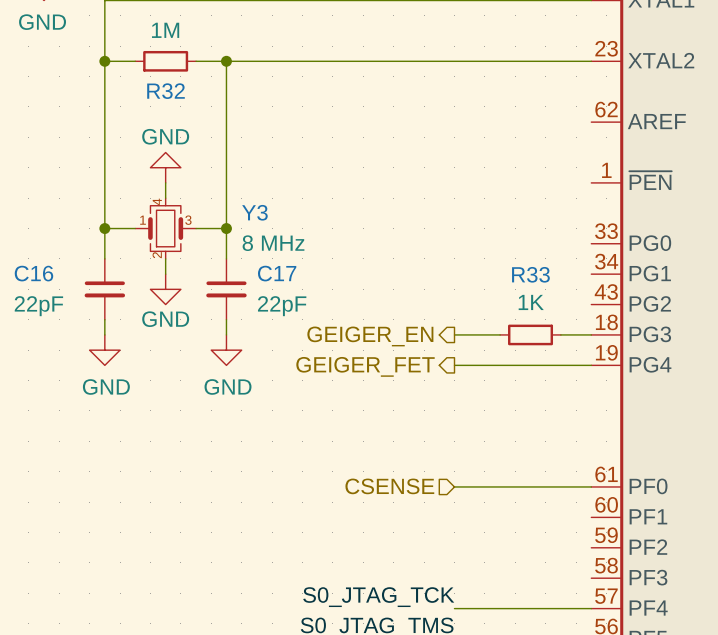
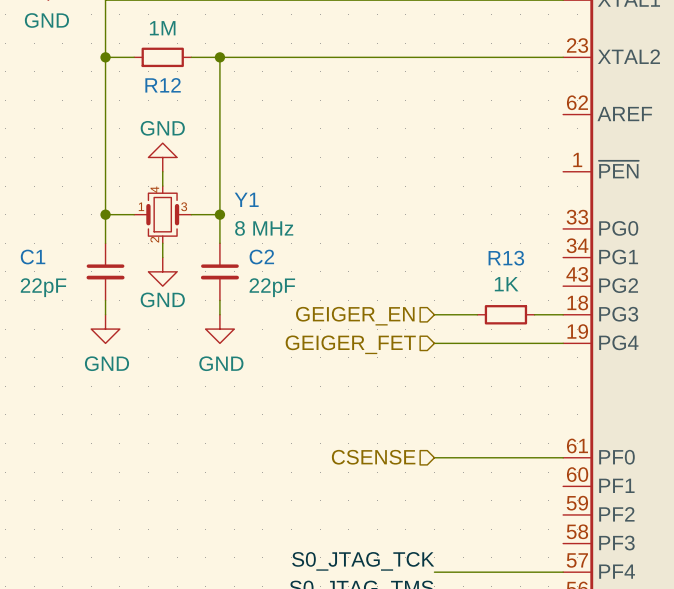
R32 name: R32 (166, 91) -> R12 (163, 85)
Y3 name: Y3 (254, 212) -> Y1 (246, 199)
C16 name: C16 (33, 273) -> C1 (33, 257)
C17 name: C17 (277, 273) -> C2 (261, 257)
R33 name: R33 (530, 274) -> R13 (506, 258)
hierarchical label shape: output (370, 336) -> input (355, 316)
hierarchical label shape: output (365, 366) -> input (350, 344)

